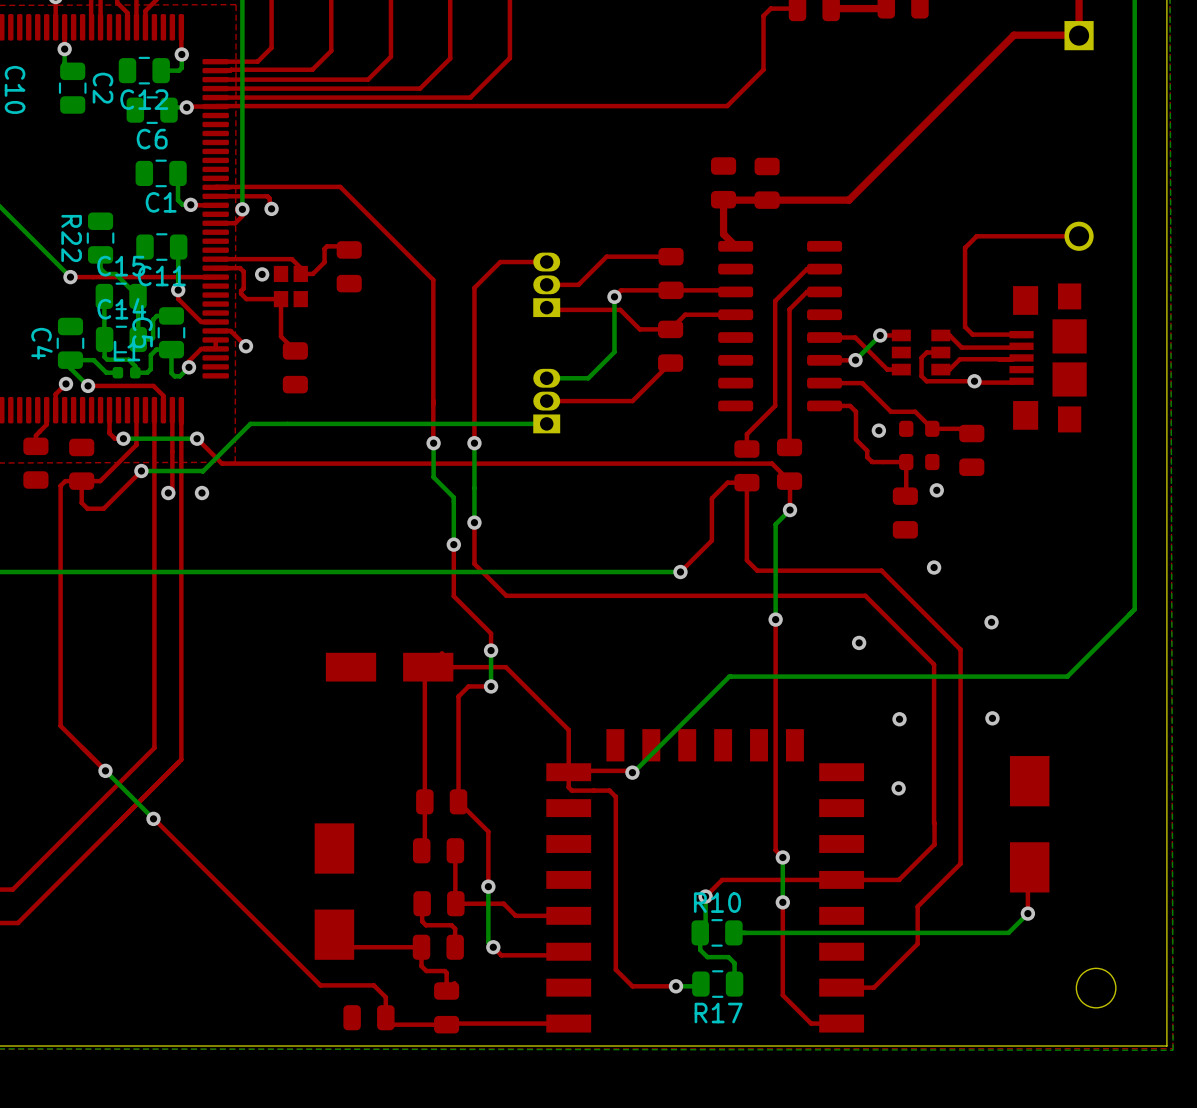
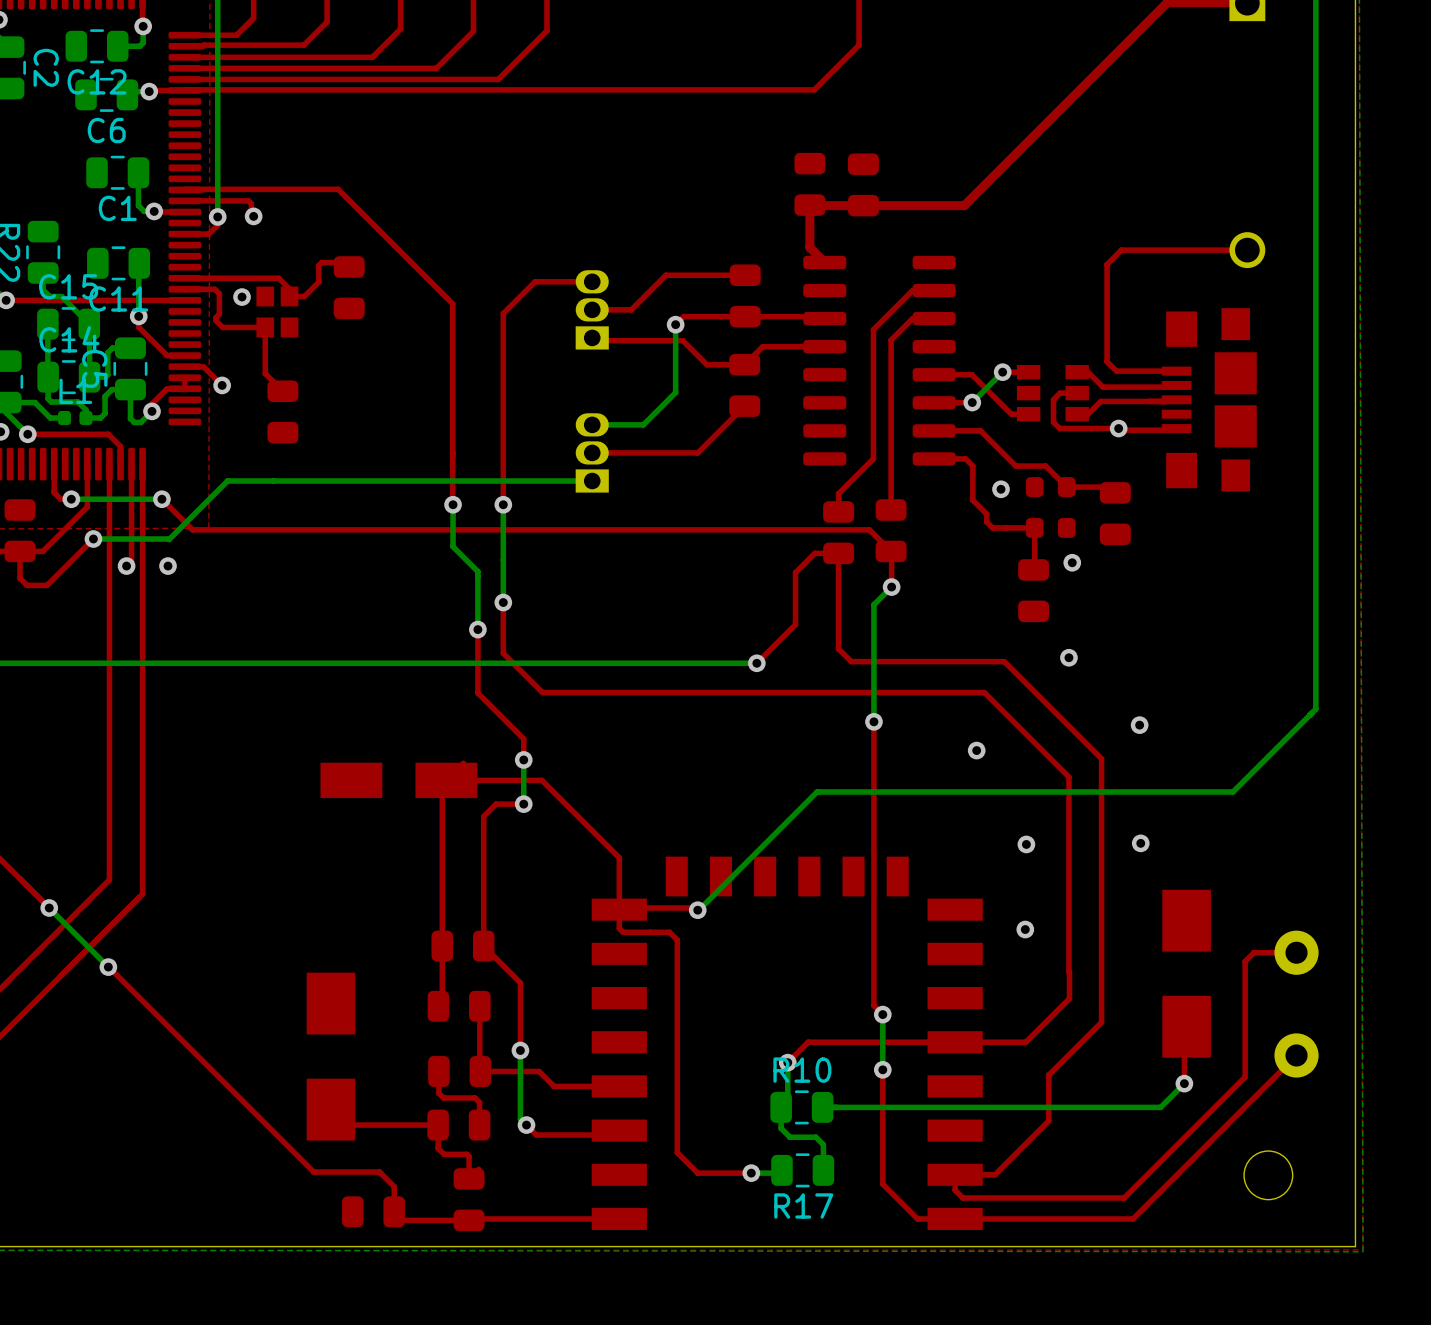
top track: none -> (1296, 952) (1253, 952) (1245, 961) (1245, 1077) (1124, 1197) (962, 1197) (955, 1190) (955, 1174)
part: none -> (1296, 952)
top track: none -> (1296, 1055) (1133, 1218) (955, 1218)
part: none -> (1296, 1055)

